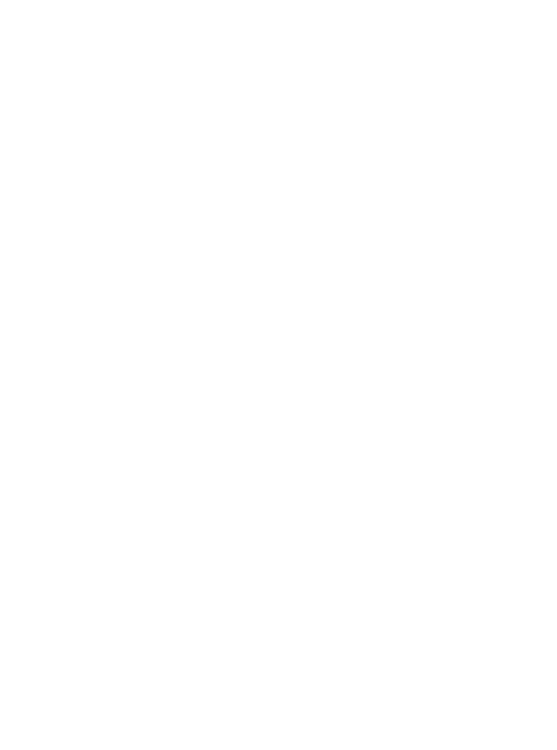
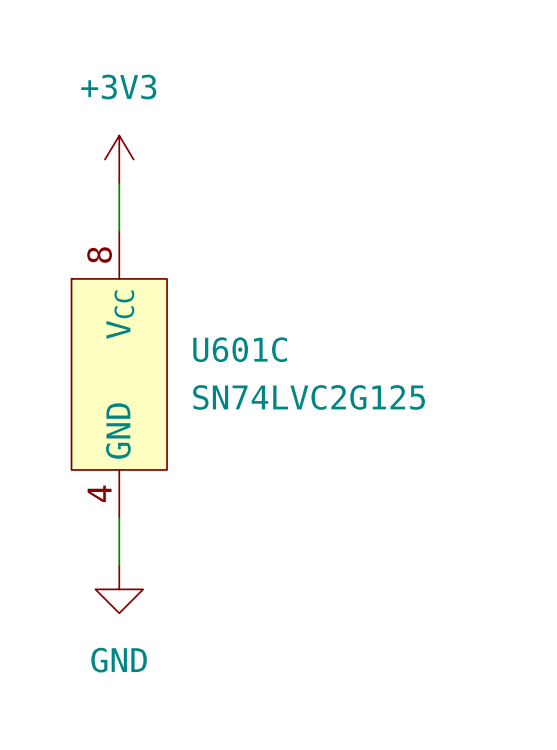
power symbol: none -> +3V3 (119, 159)
wire: none -> (119, 183) (119, 231)
U601C: none -> SN74LVC2G125 (119, 374)
wire: none -> (119, 517) (119, 565)
power symbol: none -> GND (119, 589)

